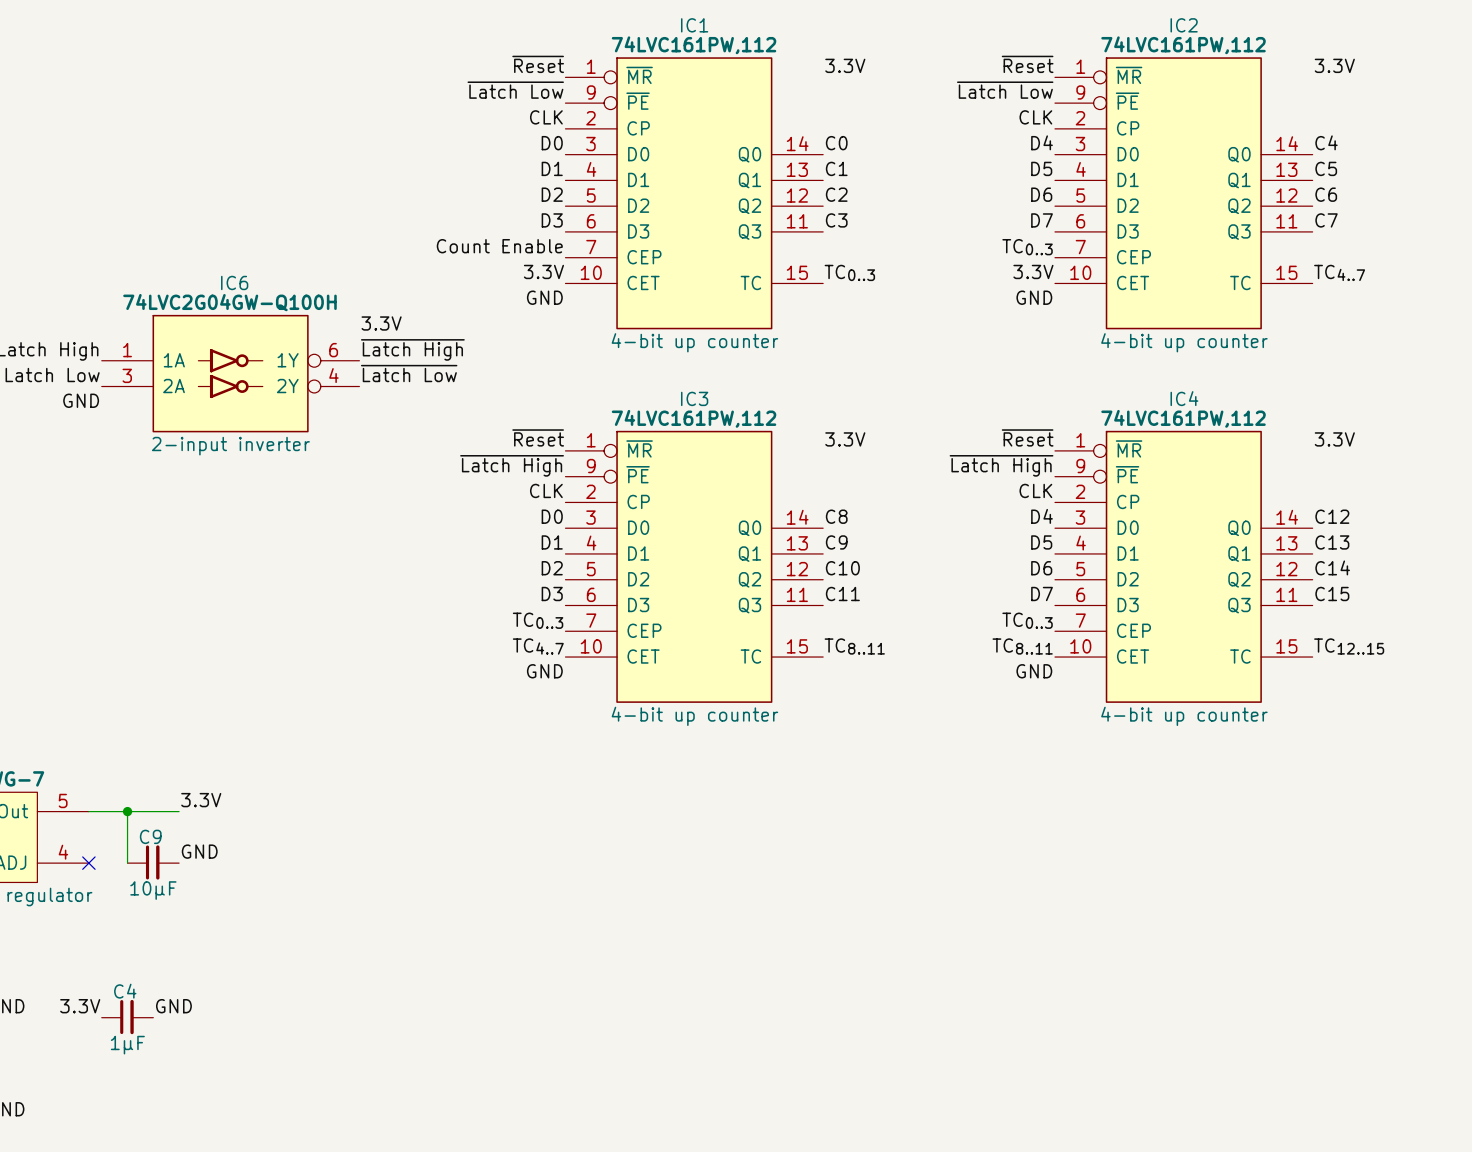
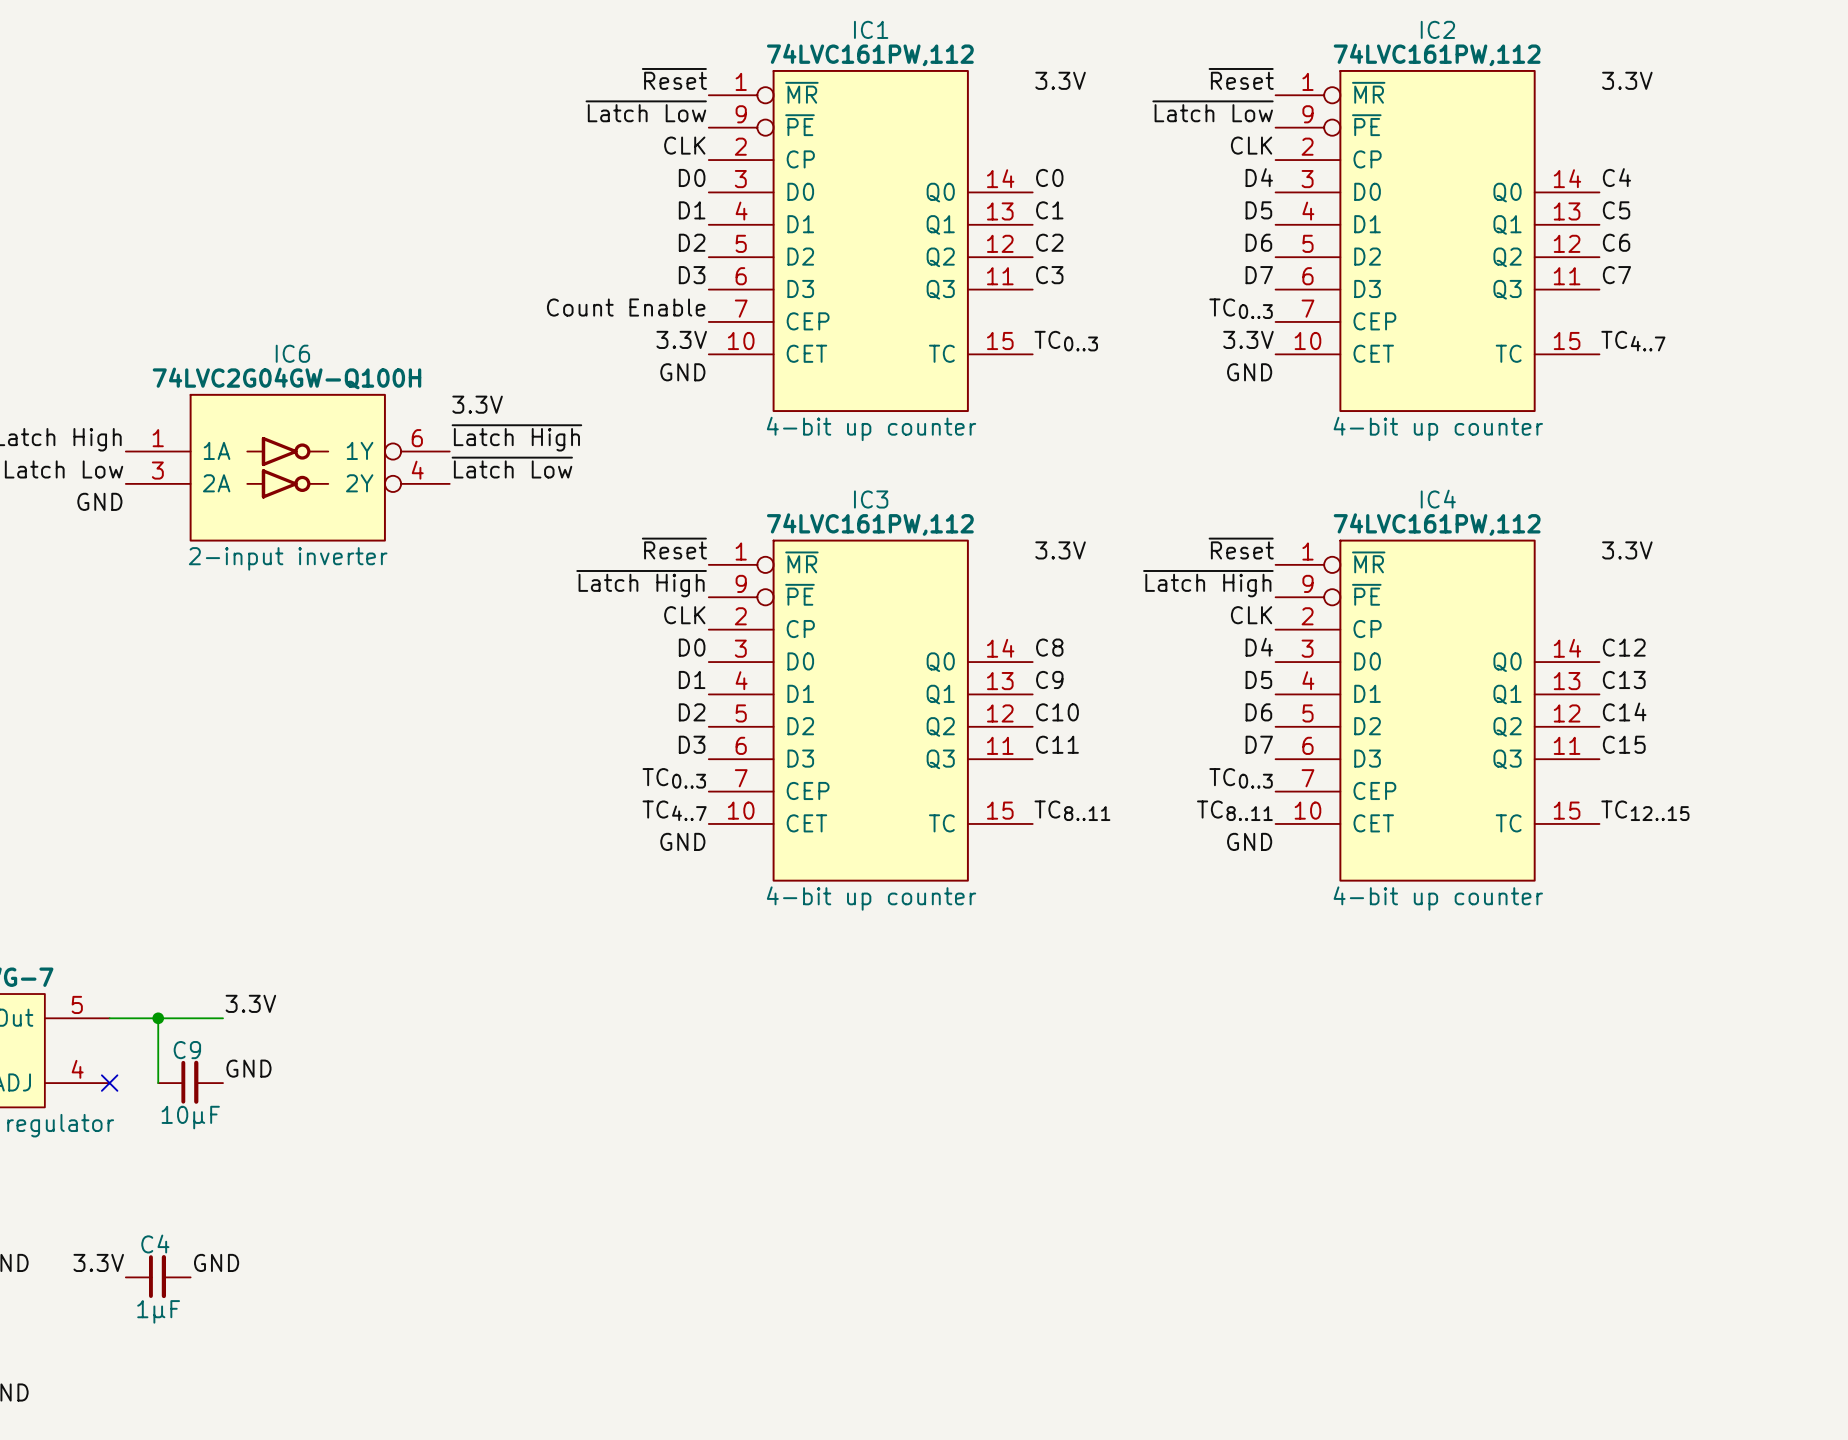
label position: ~{Reset} (1027, 64) -> ~{Reset} (1241, 78)
label position: 3.3V (1334, 65) -> 3.3V (1627, 80)
label position: ~{Latch Low} (1005, 90) -> ~{Latch Low} (1213, 111)
label position: CLK (1035, 117) -> CLK (1251, 145)
label position: D4 (1042, 142) -> D4 (1259, 177)
label position: C4 (1326, 142) -> C4 (1616, 177)
label position: D5 (1041, 168) -> D5 (1258, 210)
label position: C5 (1326, 168) -> C5 (1616, 210)
IC2 position: (1183, 193) -> (1437, 241)
label position: D6 (1041, 194) -> D6 (1258, 242)
label position: C6 (1326, 194) -> C6 (1616, 242)
label position: D7 (1042, 220) -> D7 (1259, 275)
label position: C7 (1326, 220) -> C7 (1616, 275)
label position: TC0..3 (1027, 247) -> TC0..3 (1241, 308)
label position: 3.3V (1033, 271) -> 3.3V (1248, 339)
label position: TC4..7 (1339, 272) -> TC4..7 (1633, 341)
label position: GND (1034, 297) -> GND (1249, 372)
label position: ~{Reset} (1027, 437) -> ~{Reset} (1241, 548)
label position: 3.3V (1334, 439) -> 3.3V (1627, 550)
label position: ~{Latch High} (1001, 465) -> ~{Latch High} (1208, 583)
label position: CLK (1035, 490) -> CLK (1251, 615)
label position: D4 (1042, 516) -> D4 (1259, 647)
label position: C12 (1332, 516) -> C12 (1624, 647)
label position: D5 (1041, 542) -> D5 (1258, 679)
label position: C13 (1332, 542) -> C13 (1624, 679)
IC4 position: (1183, 566) -> (1437, 710)
label position: C14 (1332, 567) -> C14 (1624, 711)
label position: D6 (1041, 568) -> D6 (1258, 712)
label position: D7 (1042, 594) -> D7 (1259, 744)
label position: C15 (1332, 594) -> C15 (1624, 744)
label position: TC0..3 (1027, 620) -> TC0..3 (1241, 778)
label position: TC8..11 (1022, 646) -> TC8..11 (1234, 810)
label position: TC12..15 (1349, 646) -> TC12..15 (1645, 810)
label position: GND (1034, 671) -> GND (1249, 841)

